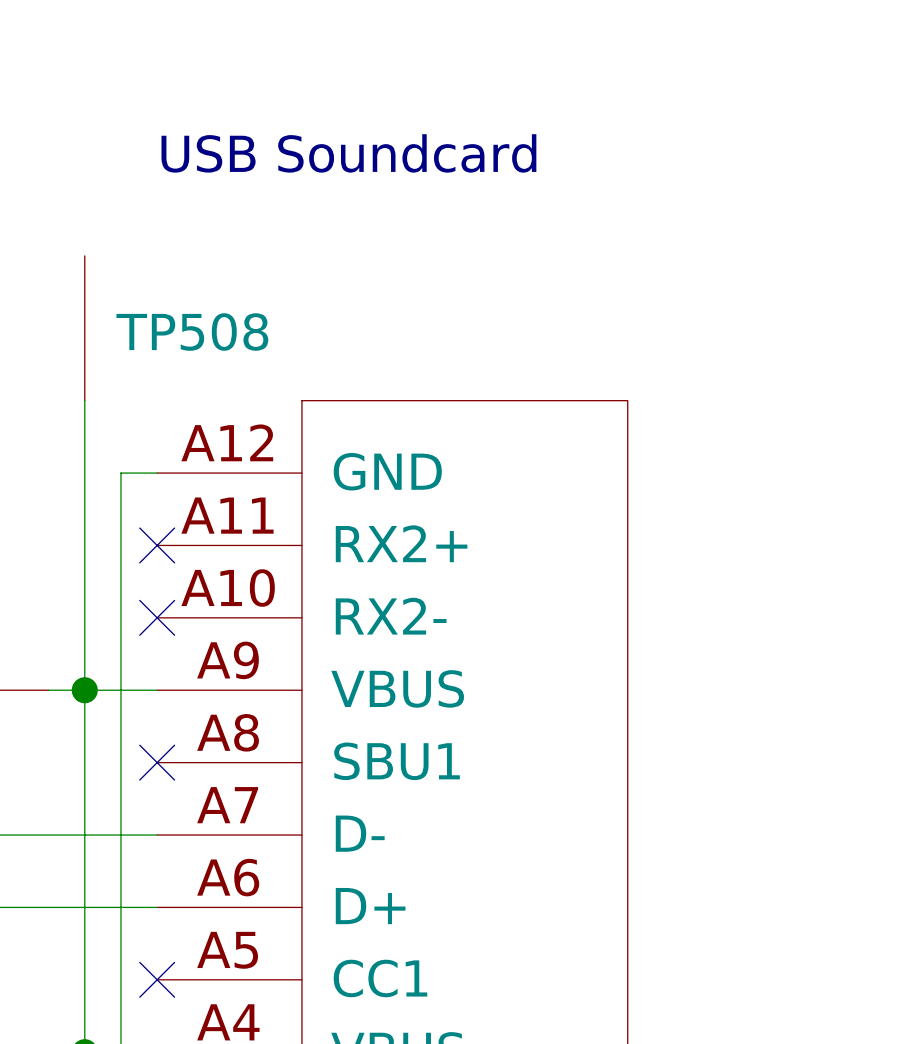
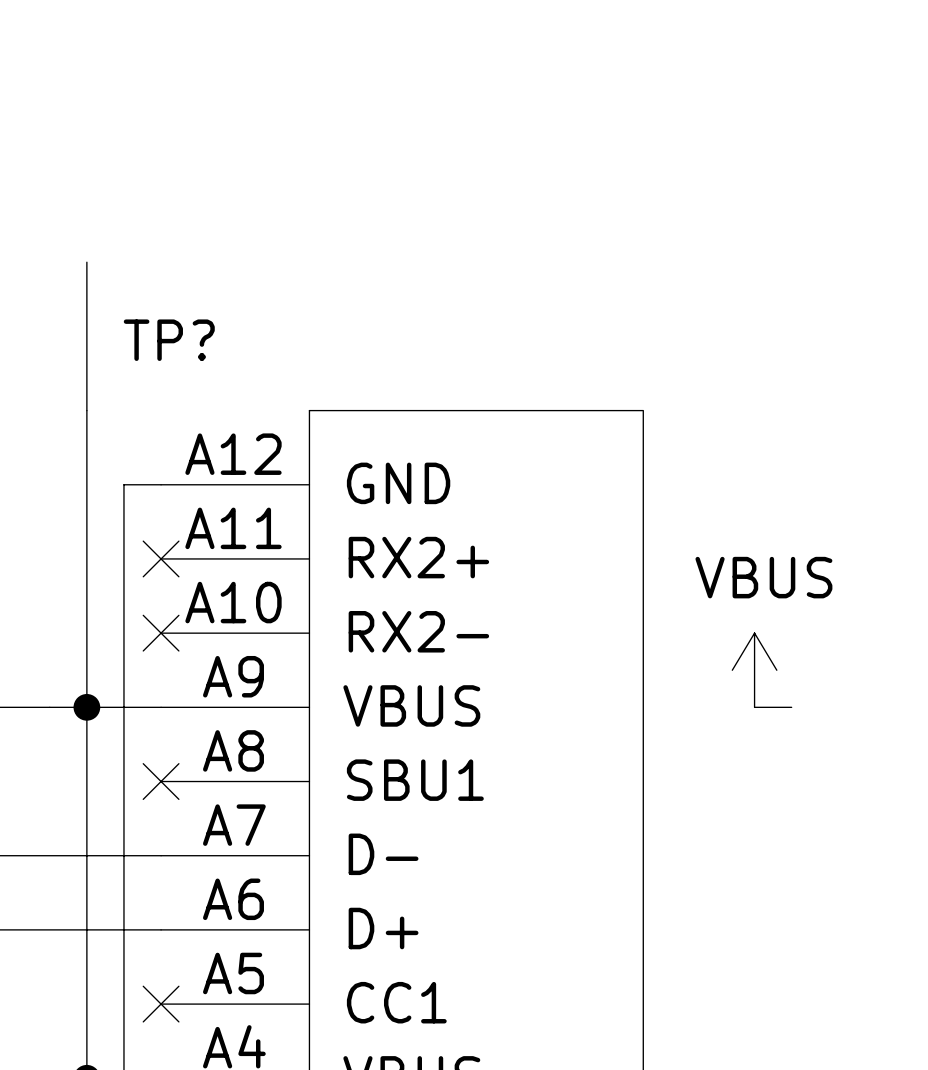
text: USB Soundcard (348, 153) -> none
TP508 name: TP508 (192, 332) -> TP? (169, 340)
power symbol: none -> VBUS (754, 670)
wire: none -> (754, 707) (791, 707)

